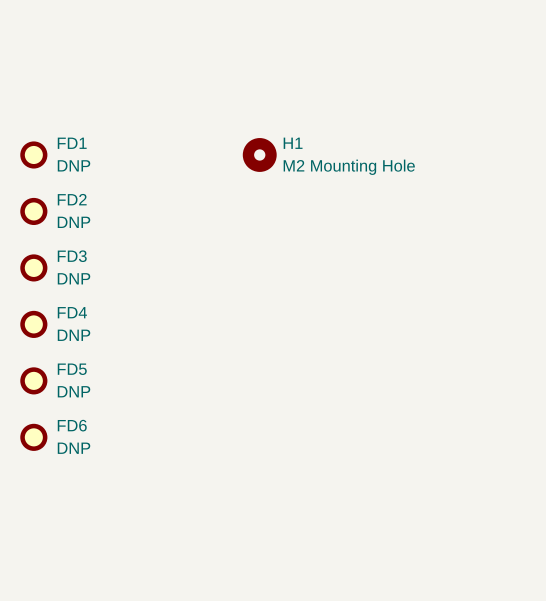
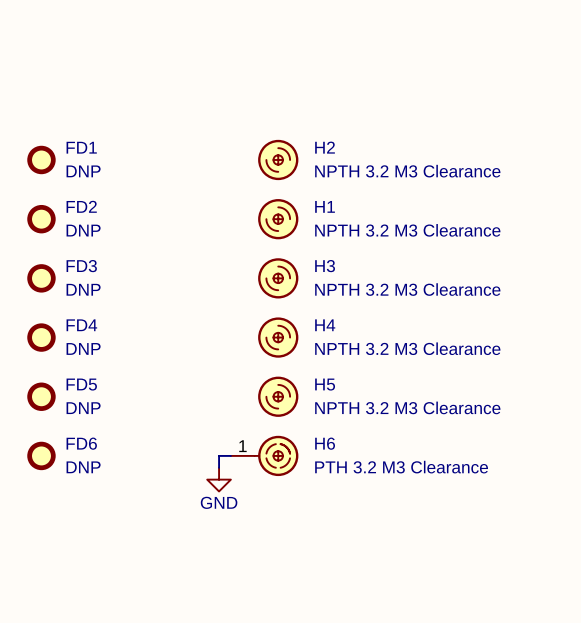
H1 symbol: [242, 138, 277, 172] -> [258, 199, 299, 240]
H2: none -> NPTH 3.2 M3 Clearance (278, 159)
H1 text: M2 Mounting Hole (349, 167) -> none
H1 value: none -> NPTH 3.2 M3 Clearance (407, 230)
H3: none -> NPTH 3.2 M3 Clearance (278, 278)
H4: none -> NPTH 3.2 M3 Clearance (278, 337)
H5: none -> NPTH 3.2 M3 Clearance (278, 396)
wire: none -> (230, 455) (219, 455) (219, 467)
H6: none -> PTH 3.2 M3 Clearance (264, 455)
power symbol: none -> GND (219, 479)

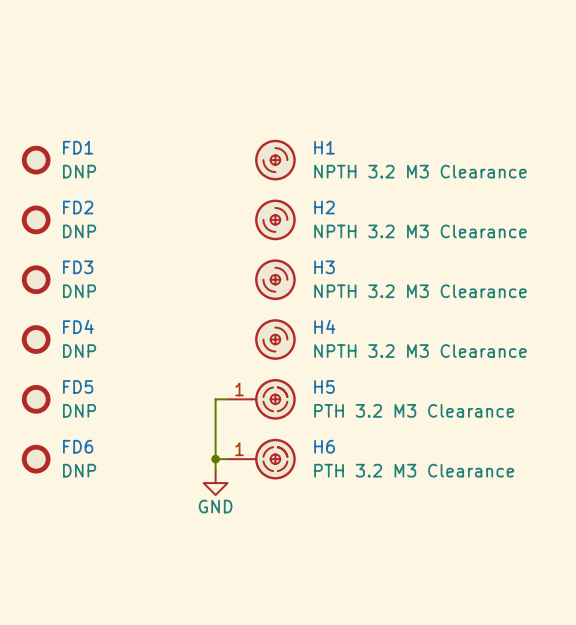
H2 name: H2 (325, 147) -> H1 (324, 147)
H1 name: H1 (325, 206) -> H2 (324, 207)
H5 symbol: [258, 376, 299, 417] -> [227, 379, 296, 420]
wire: none -> (227, 399) (215, 399) (215, 459)
H5 value: NPTH 3.2 M3 Clearance (407, 407) -> PTH 3.2 M3 Clearance (414, 410)
junction: none -> (215, 459)

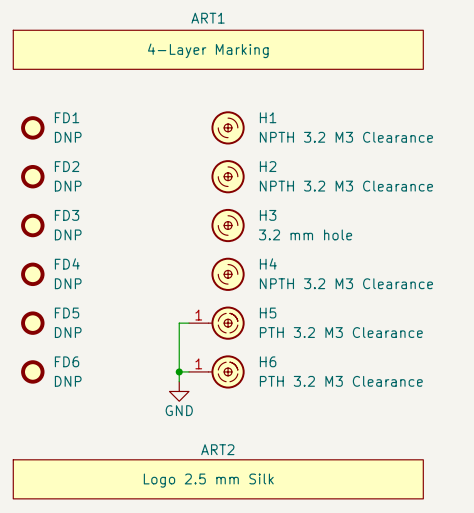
ART1: none -> 4-Layer Marking (218, 49)
H3 text: none -> 3.2 mm hole (305, 234)
H3 value: NPTH 3.2 M3 Clearance (420, 291) -> none
ART2: none -> Logo 2.5 mm Silk (218, 479)

